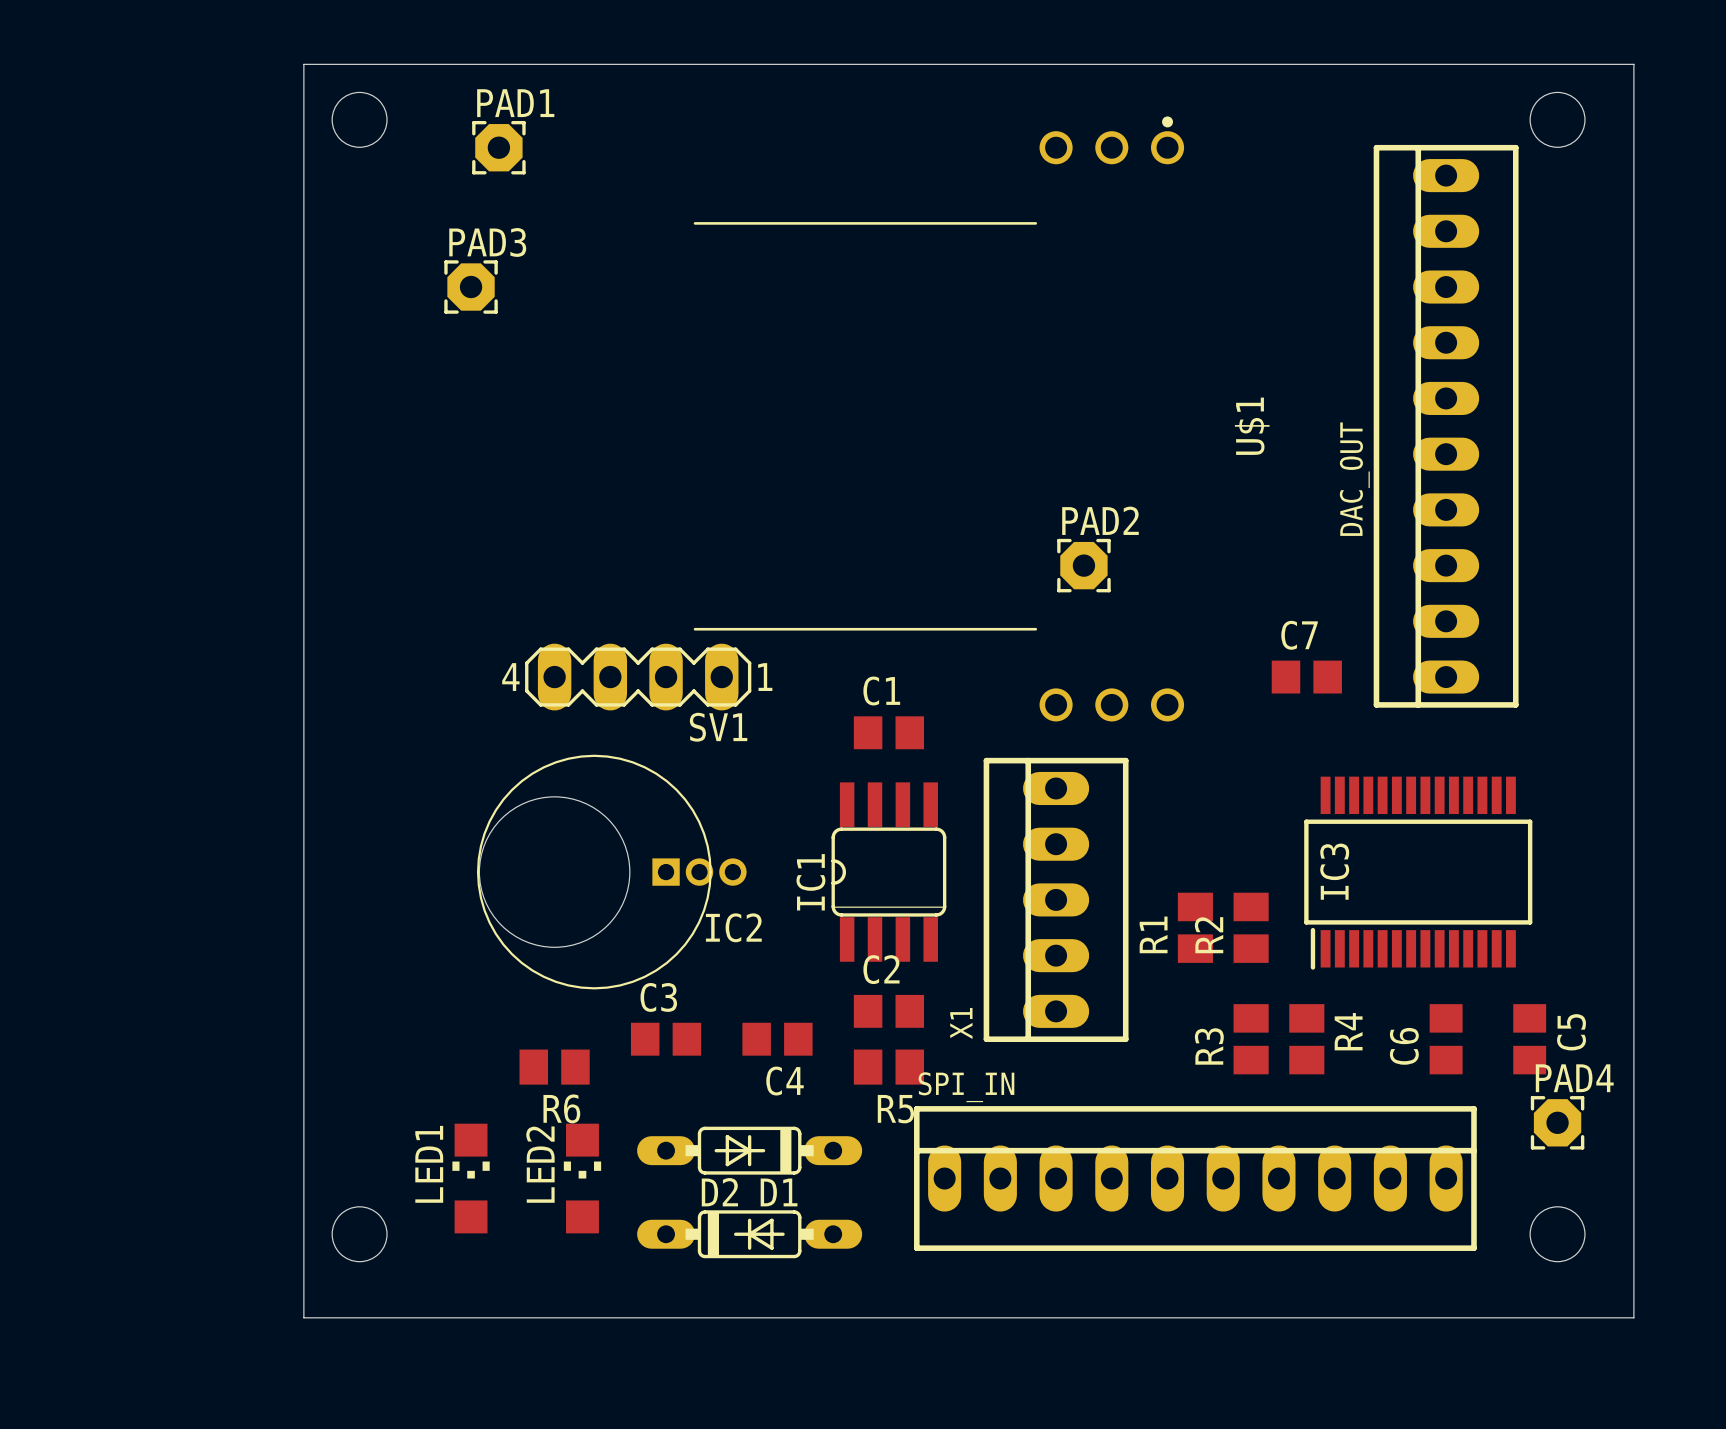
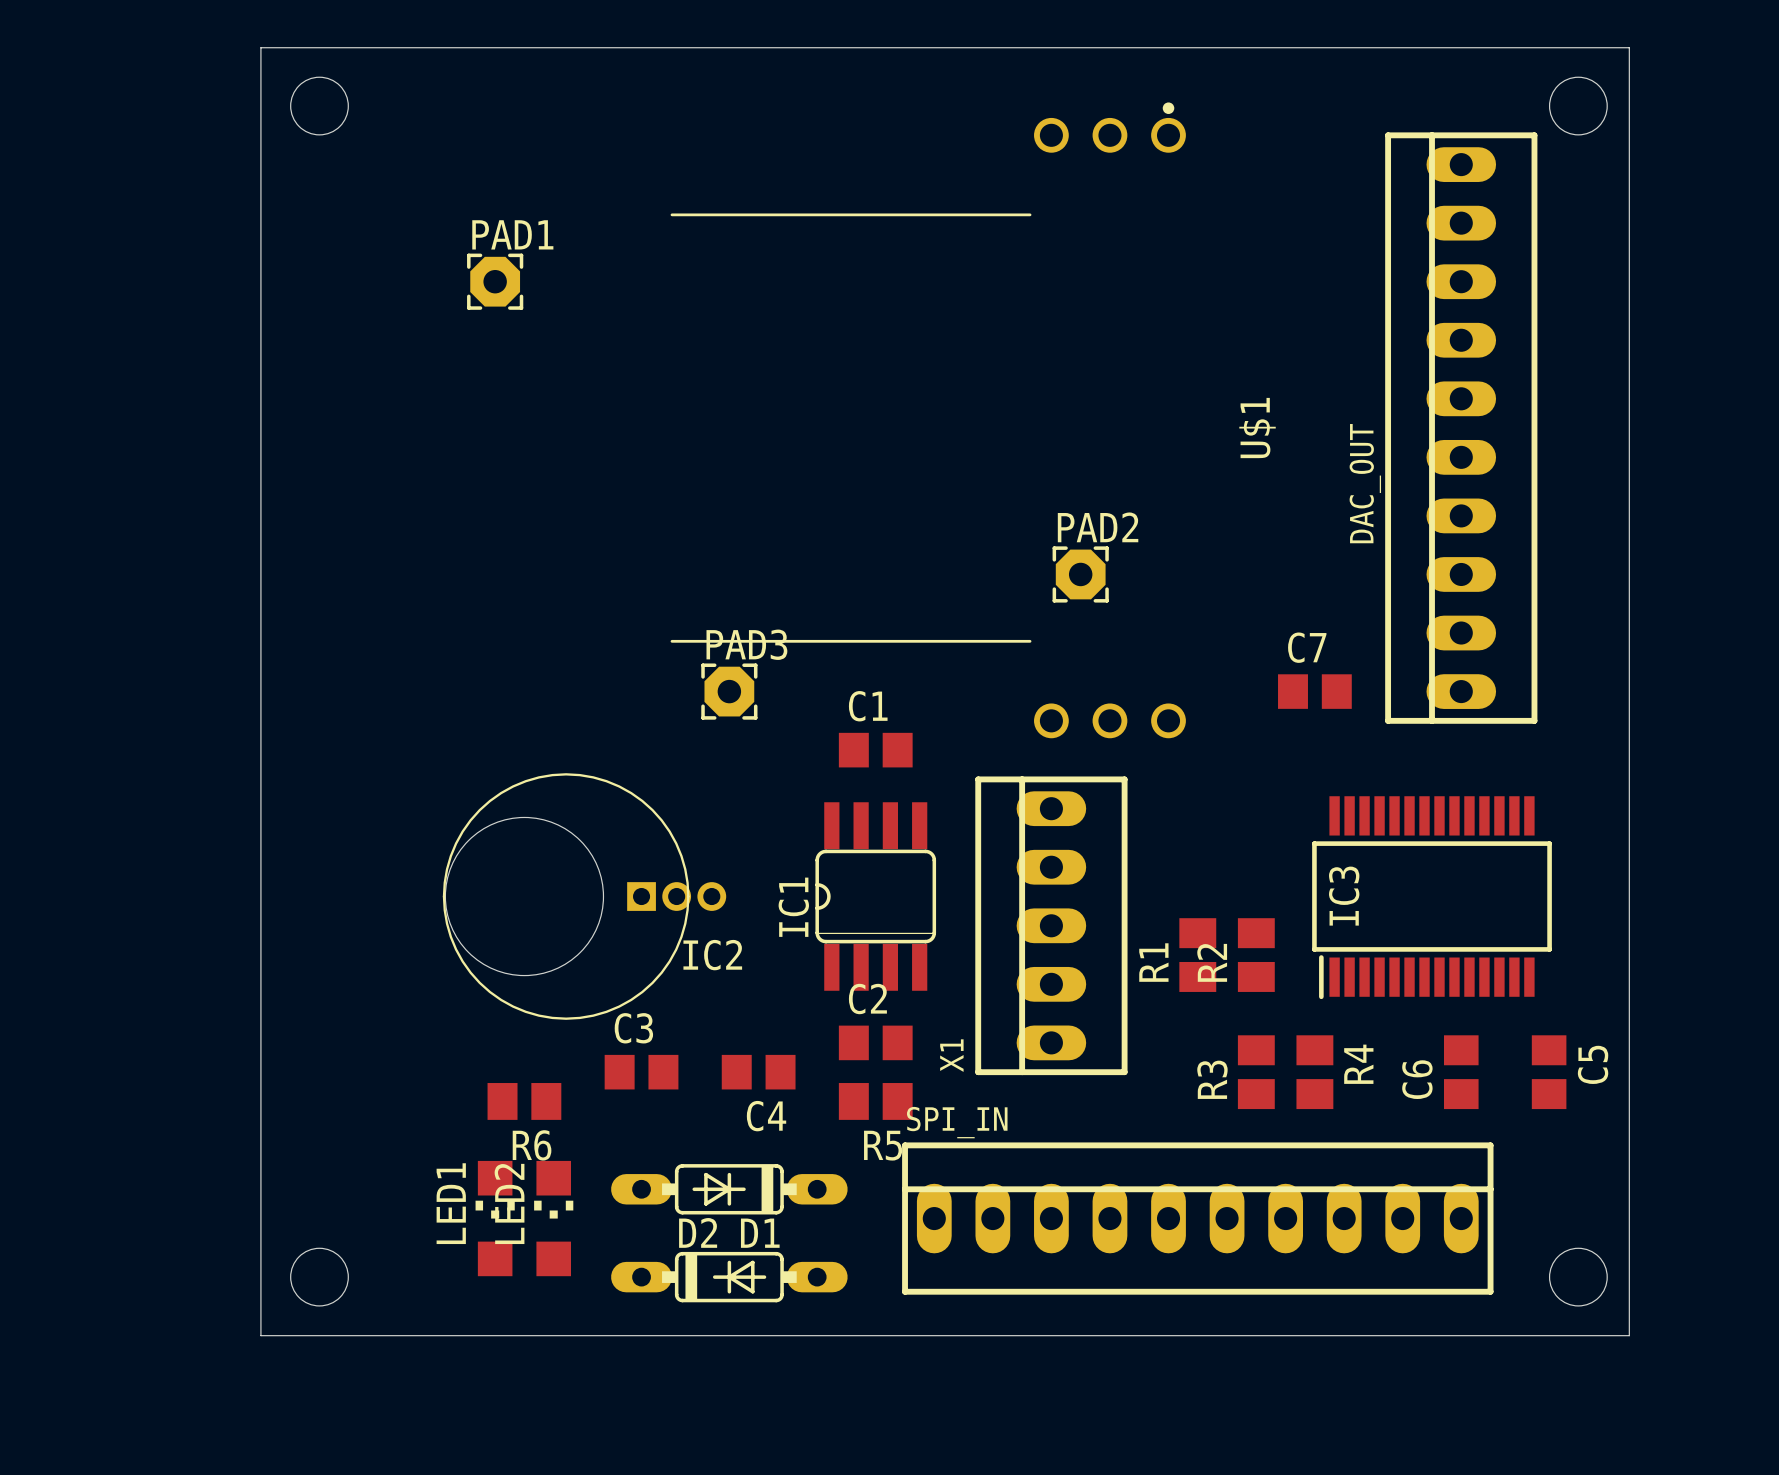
board edge: (1606, 64) (1633, 64) (1633, 1317) (303, 1317) (303, 1289) -> (1629, 47) (1629, 1335) (260, 1335)
PAD1 position: (498, 147) -> (495, 281)
PAD3 position: (471, 287) -> (729, 691)
SV1: (638, 677) -> none
PAD4: (1557, 1122) -> none
LED1 position: (471, 1178) -> (495, 1218)

